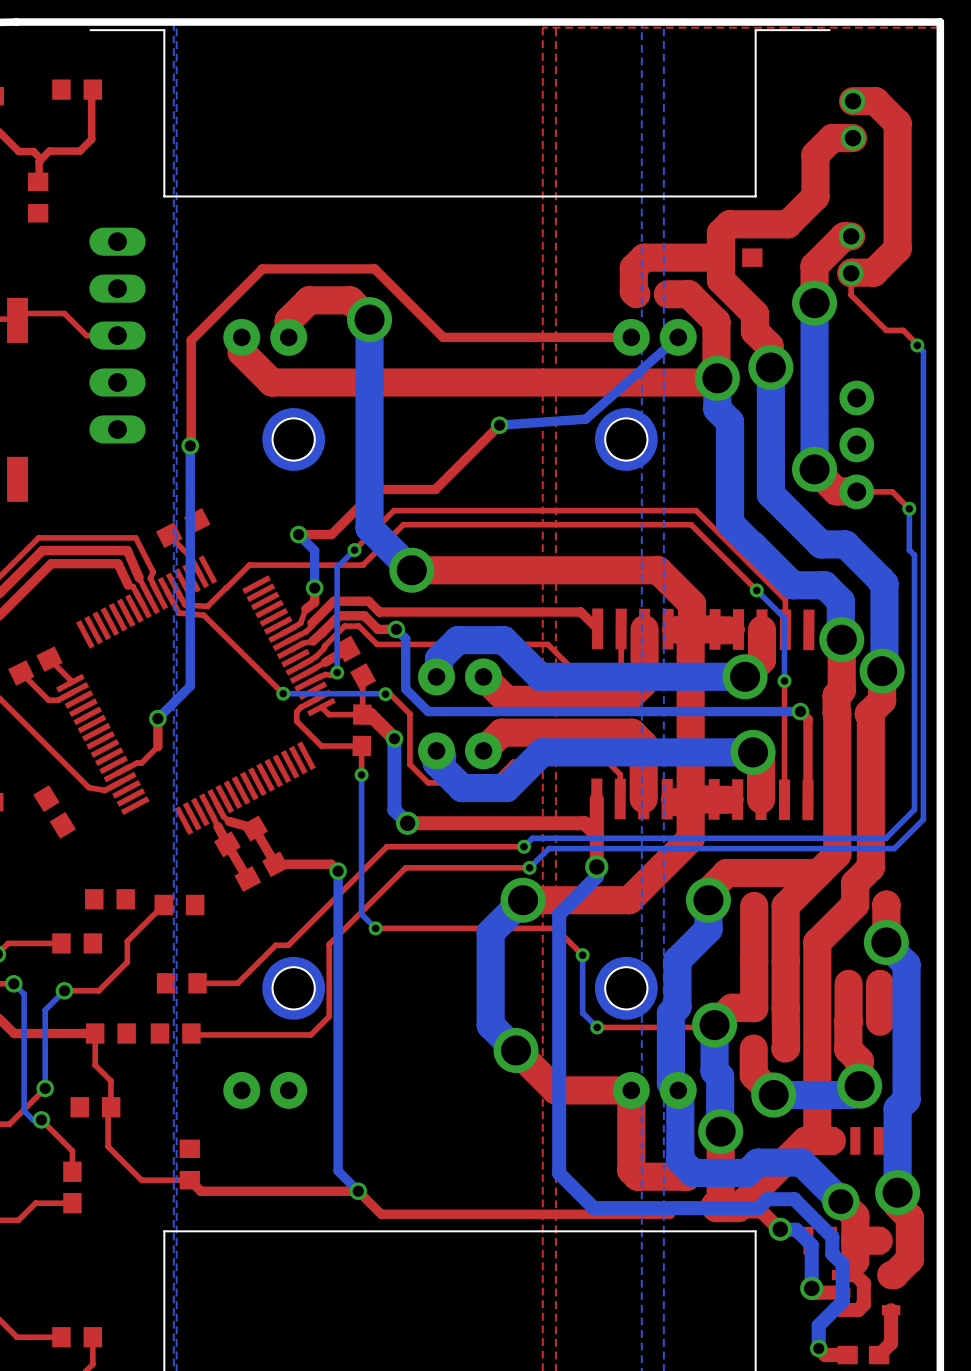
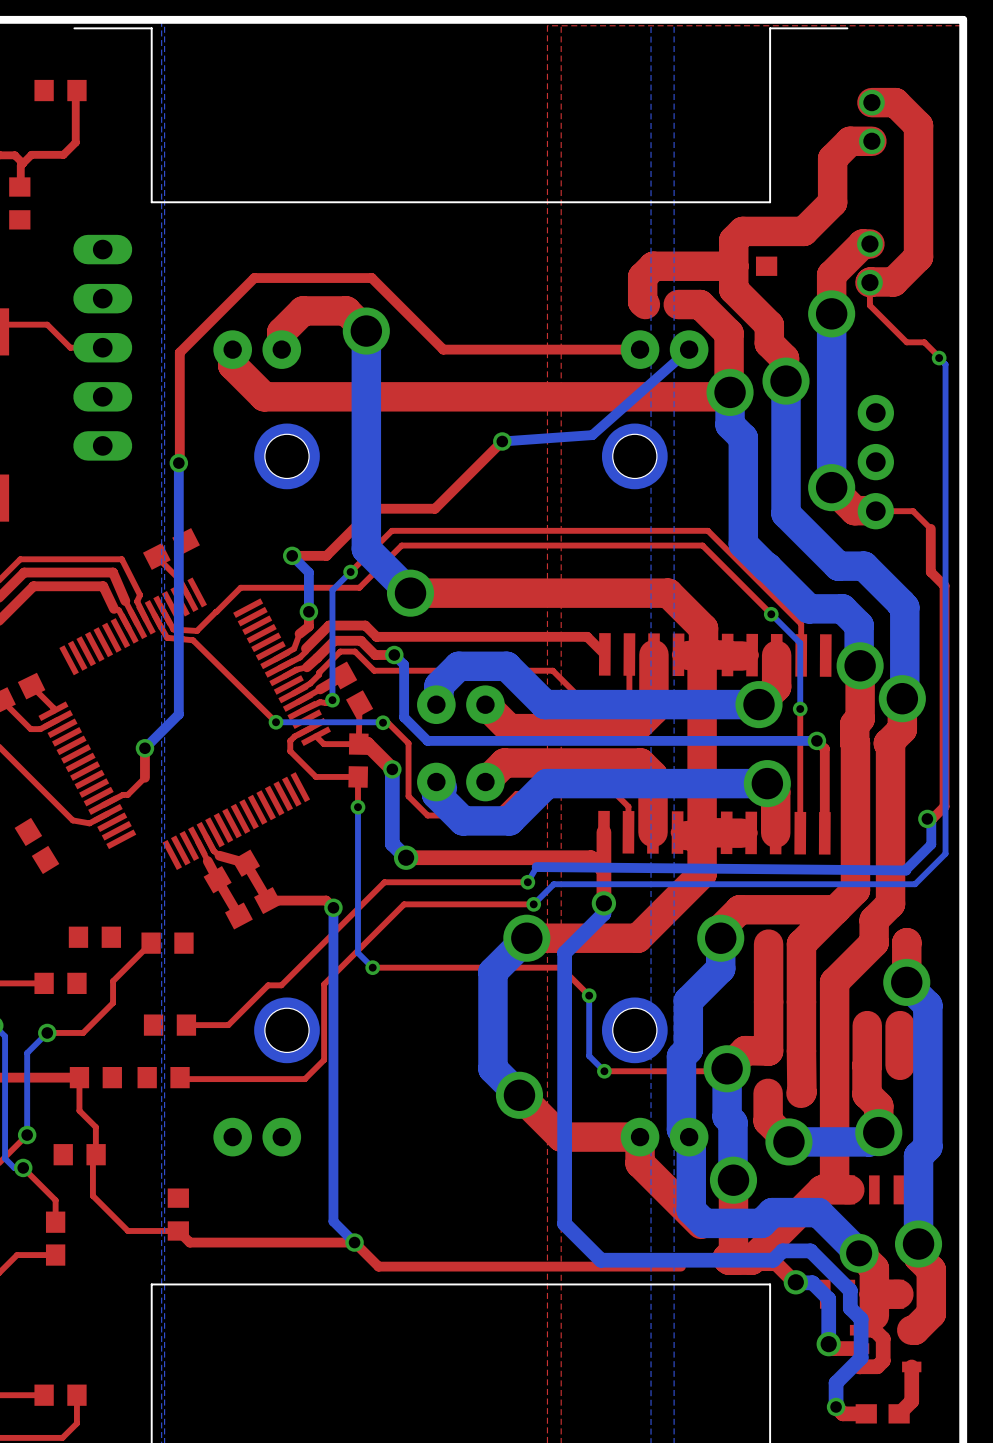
top track: none -> (930, 528) (930, 572) (944, 585) (944, 806) (932, 818) (927, 818)
bottom track: (909, 508) (909, 550) (914, 555) (914, 809) (885, 838) (532, 838) (523, 846) -> (927, 818) (931, 822) (931, 844) (906, 870) (536, 867) (527, 882)
via: (909, 508) -> none
via: none -> (927, 818)
top track: (631, 1115) (631, 1170) (637, 1176) (686, 1176) (689, 1173) -> (640, 1163) (701, 1224)

